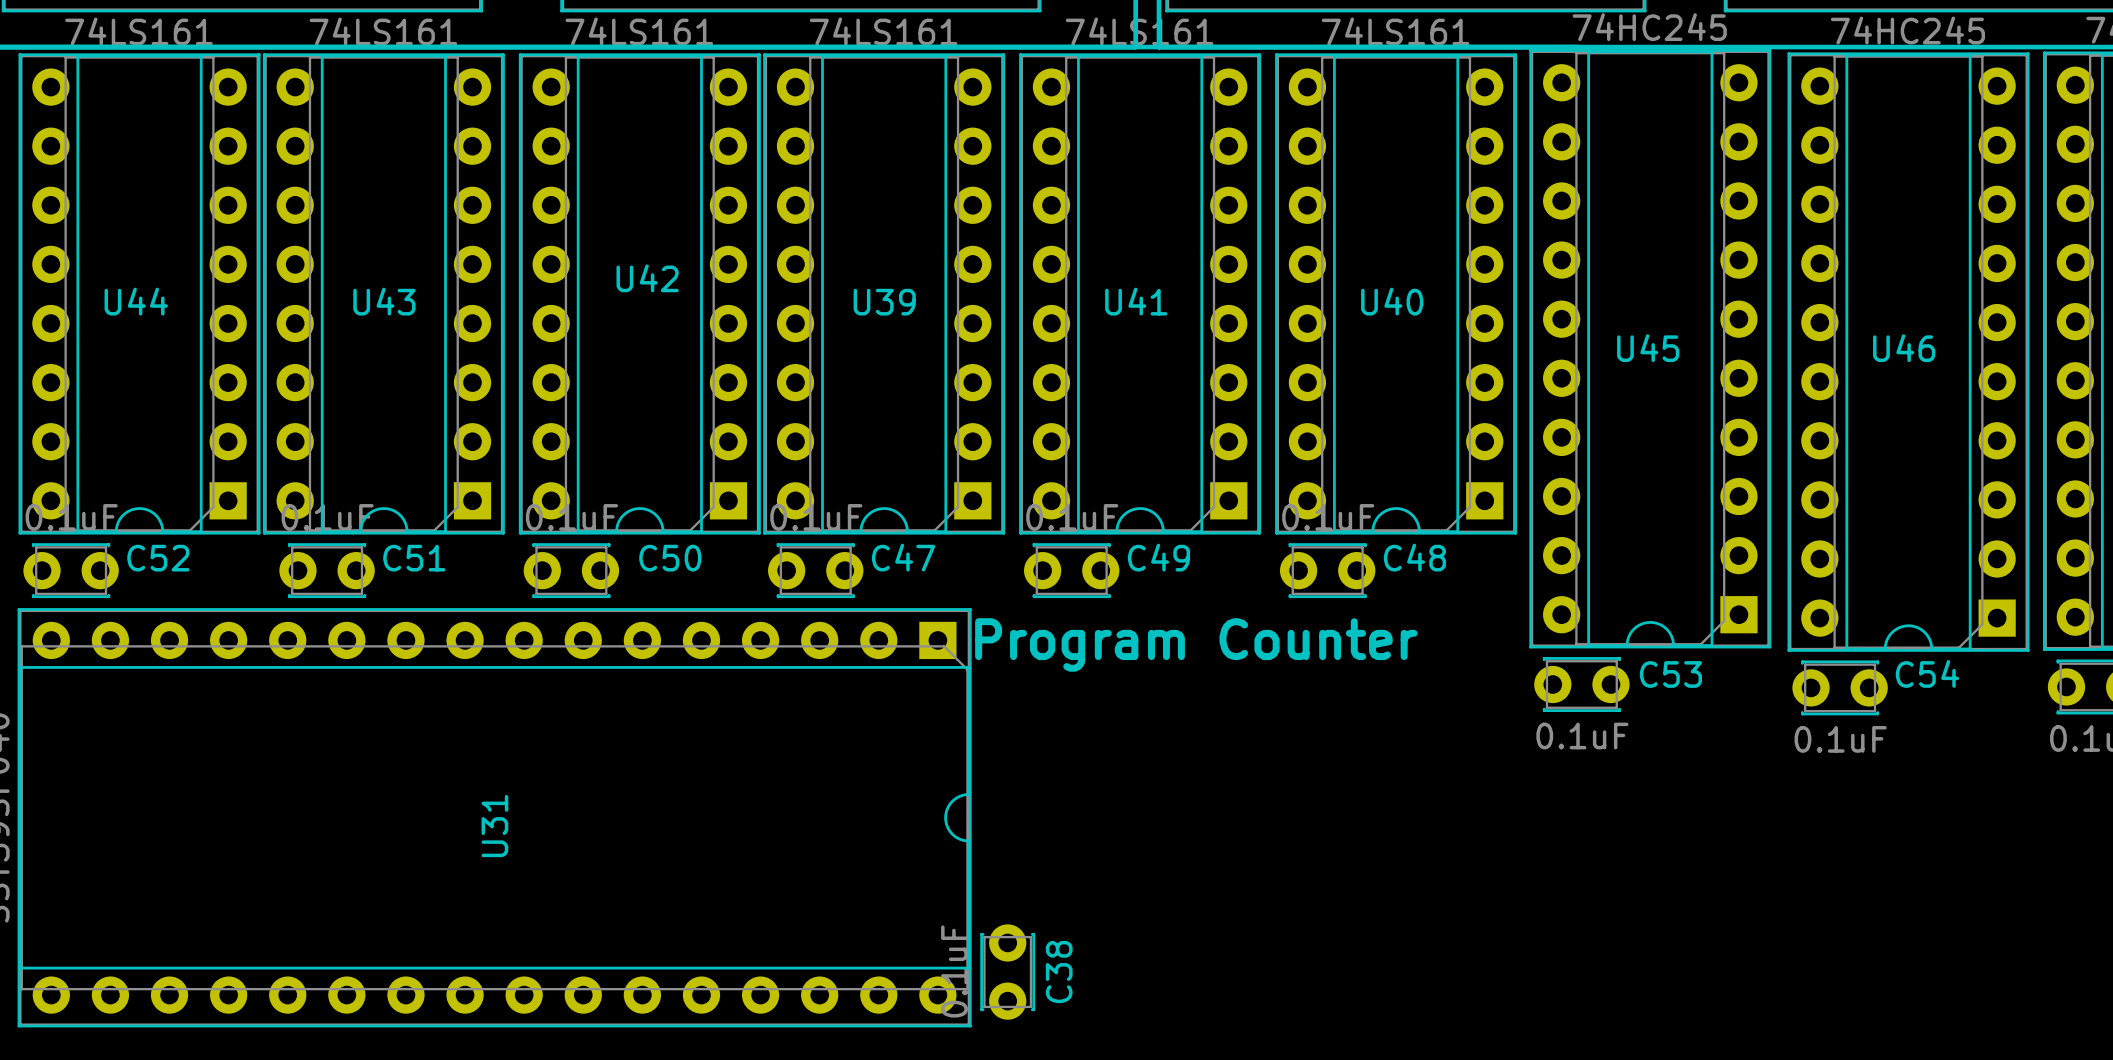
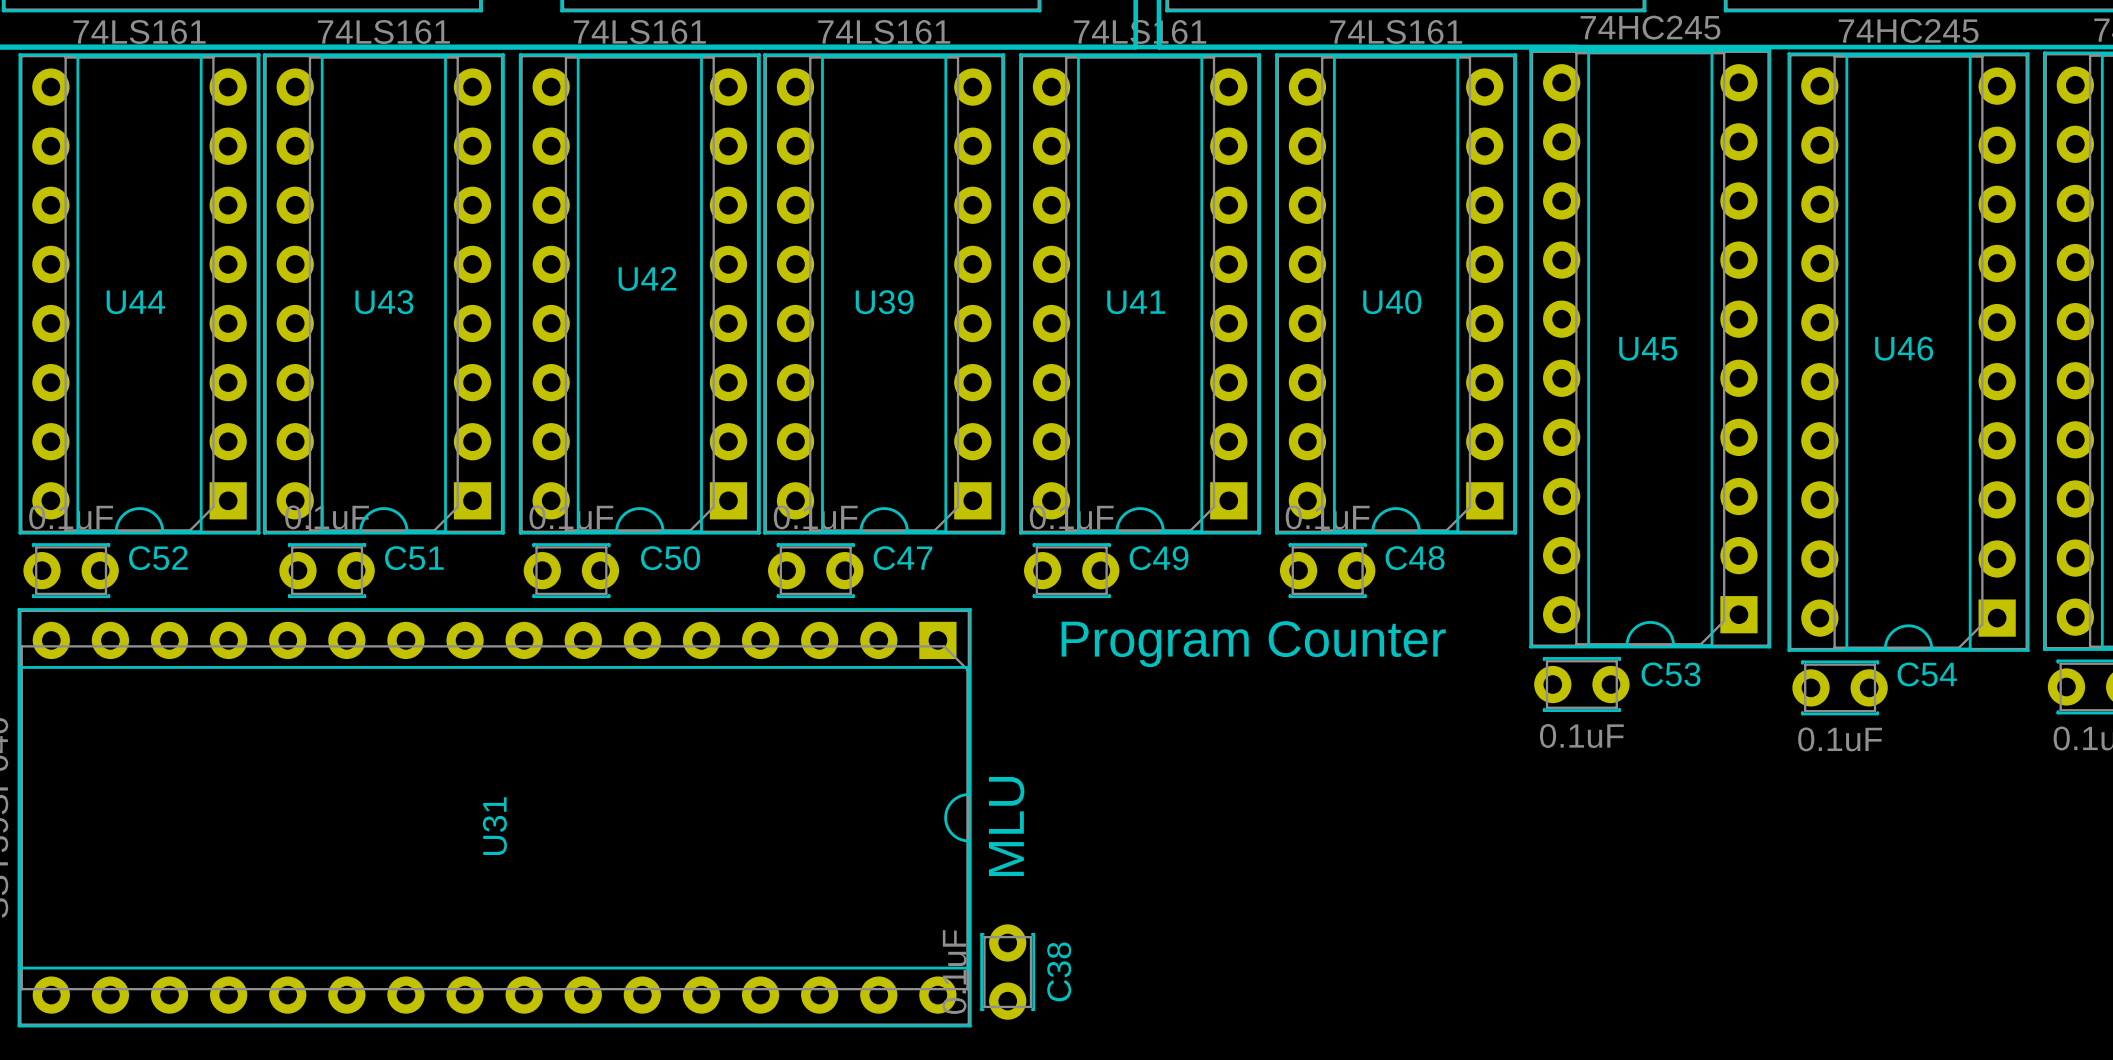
text position: Program Counter (1196, 644) -> Program Counter (1253, 644)
text: none -> MLU (1006, 826)

